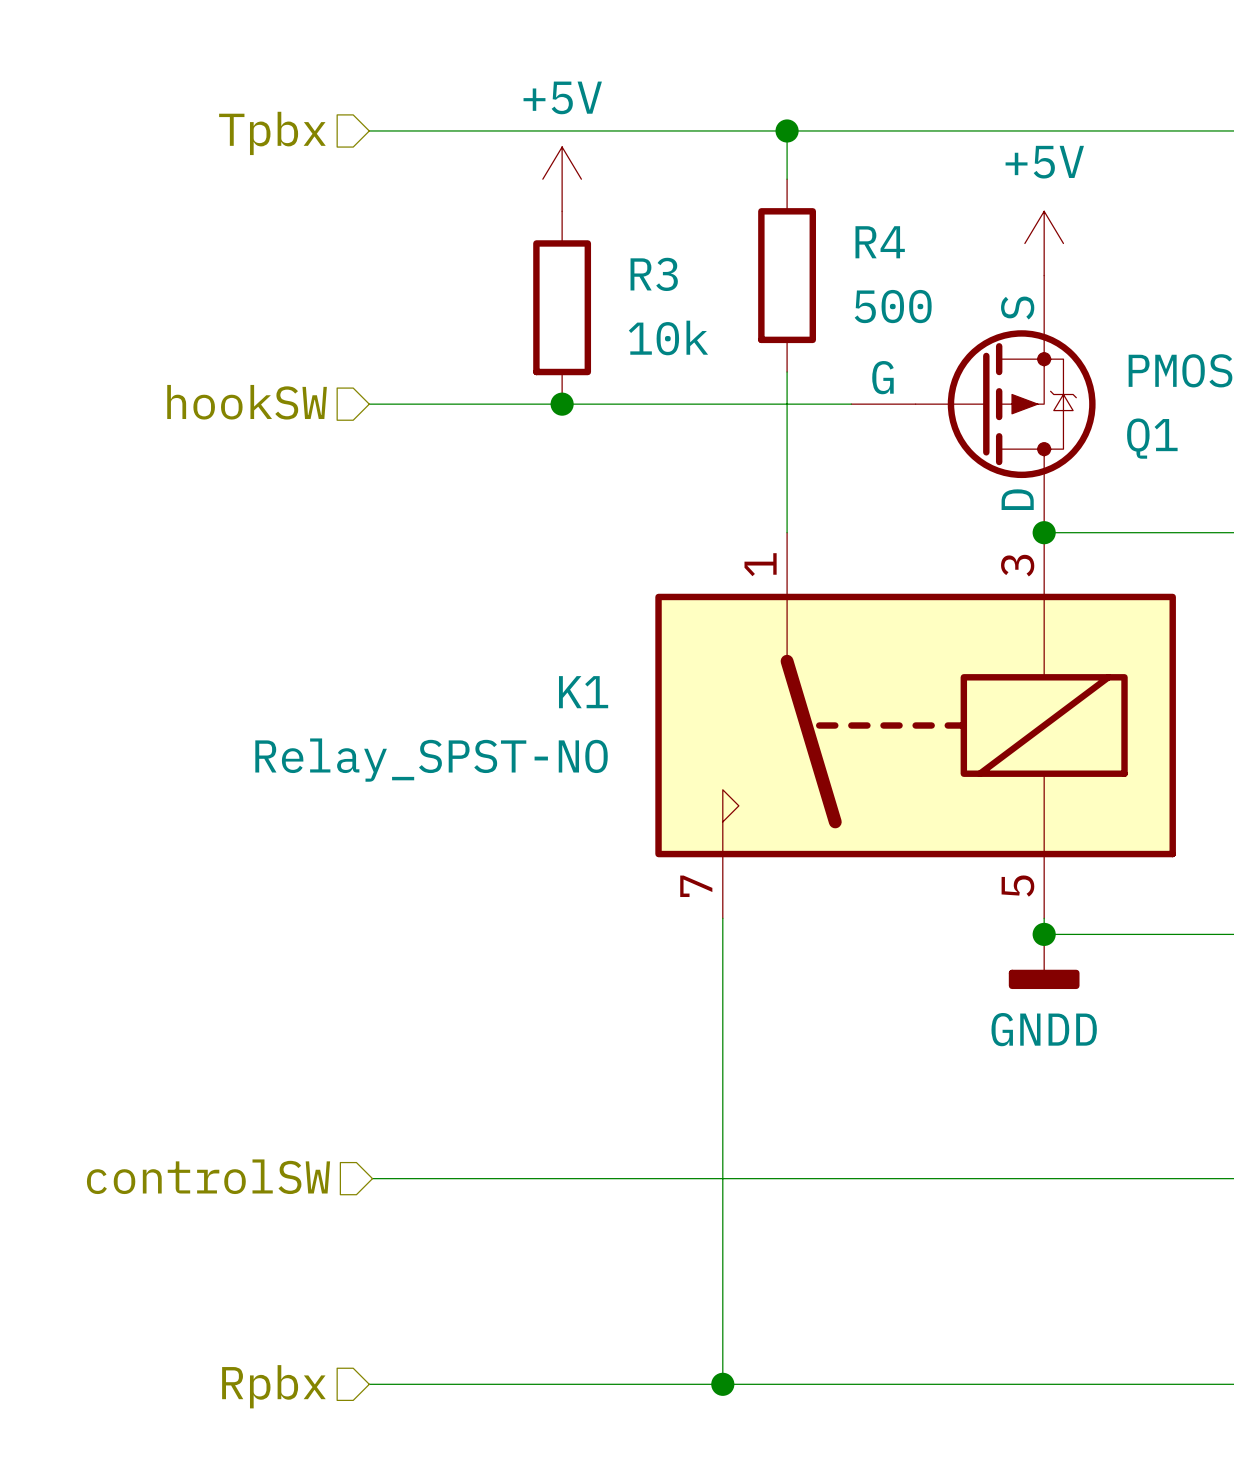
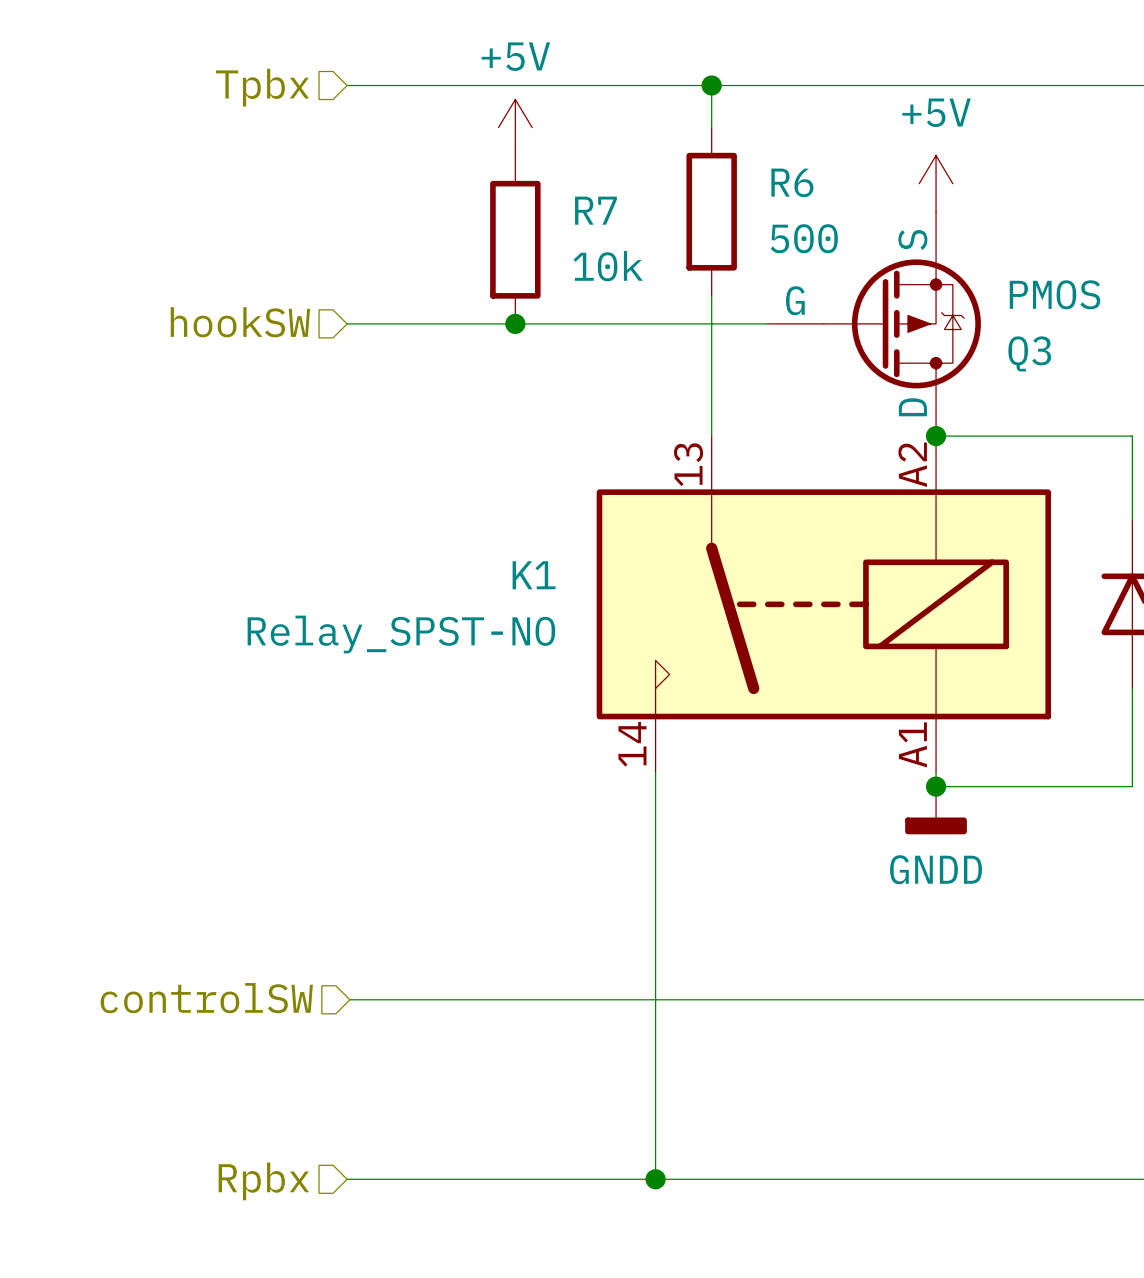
R4 name: R4 (880, 242) -> R6 (792, 182)
R3 name: R3 (654, 274) -> R7 (595, 210)
Q1 name: Q1 (1152, 438) -> Q3 (1029, 353)
K1 pin number: 1 (760, 564) -> 13 (688, 464)
K1 pin number: 3 (1017, 565) -> A2 (912, 464)
K1 pin number: 7 (696, 886) -> 14 (632, 744)
K1 pin number: 5 (1017, 886) -> A1 (912, 744)

